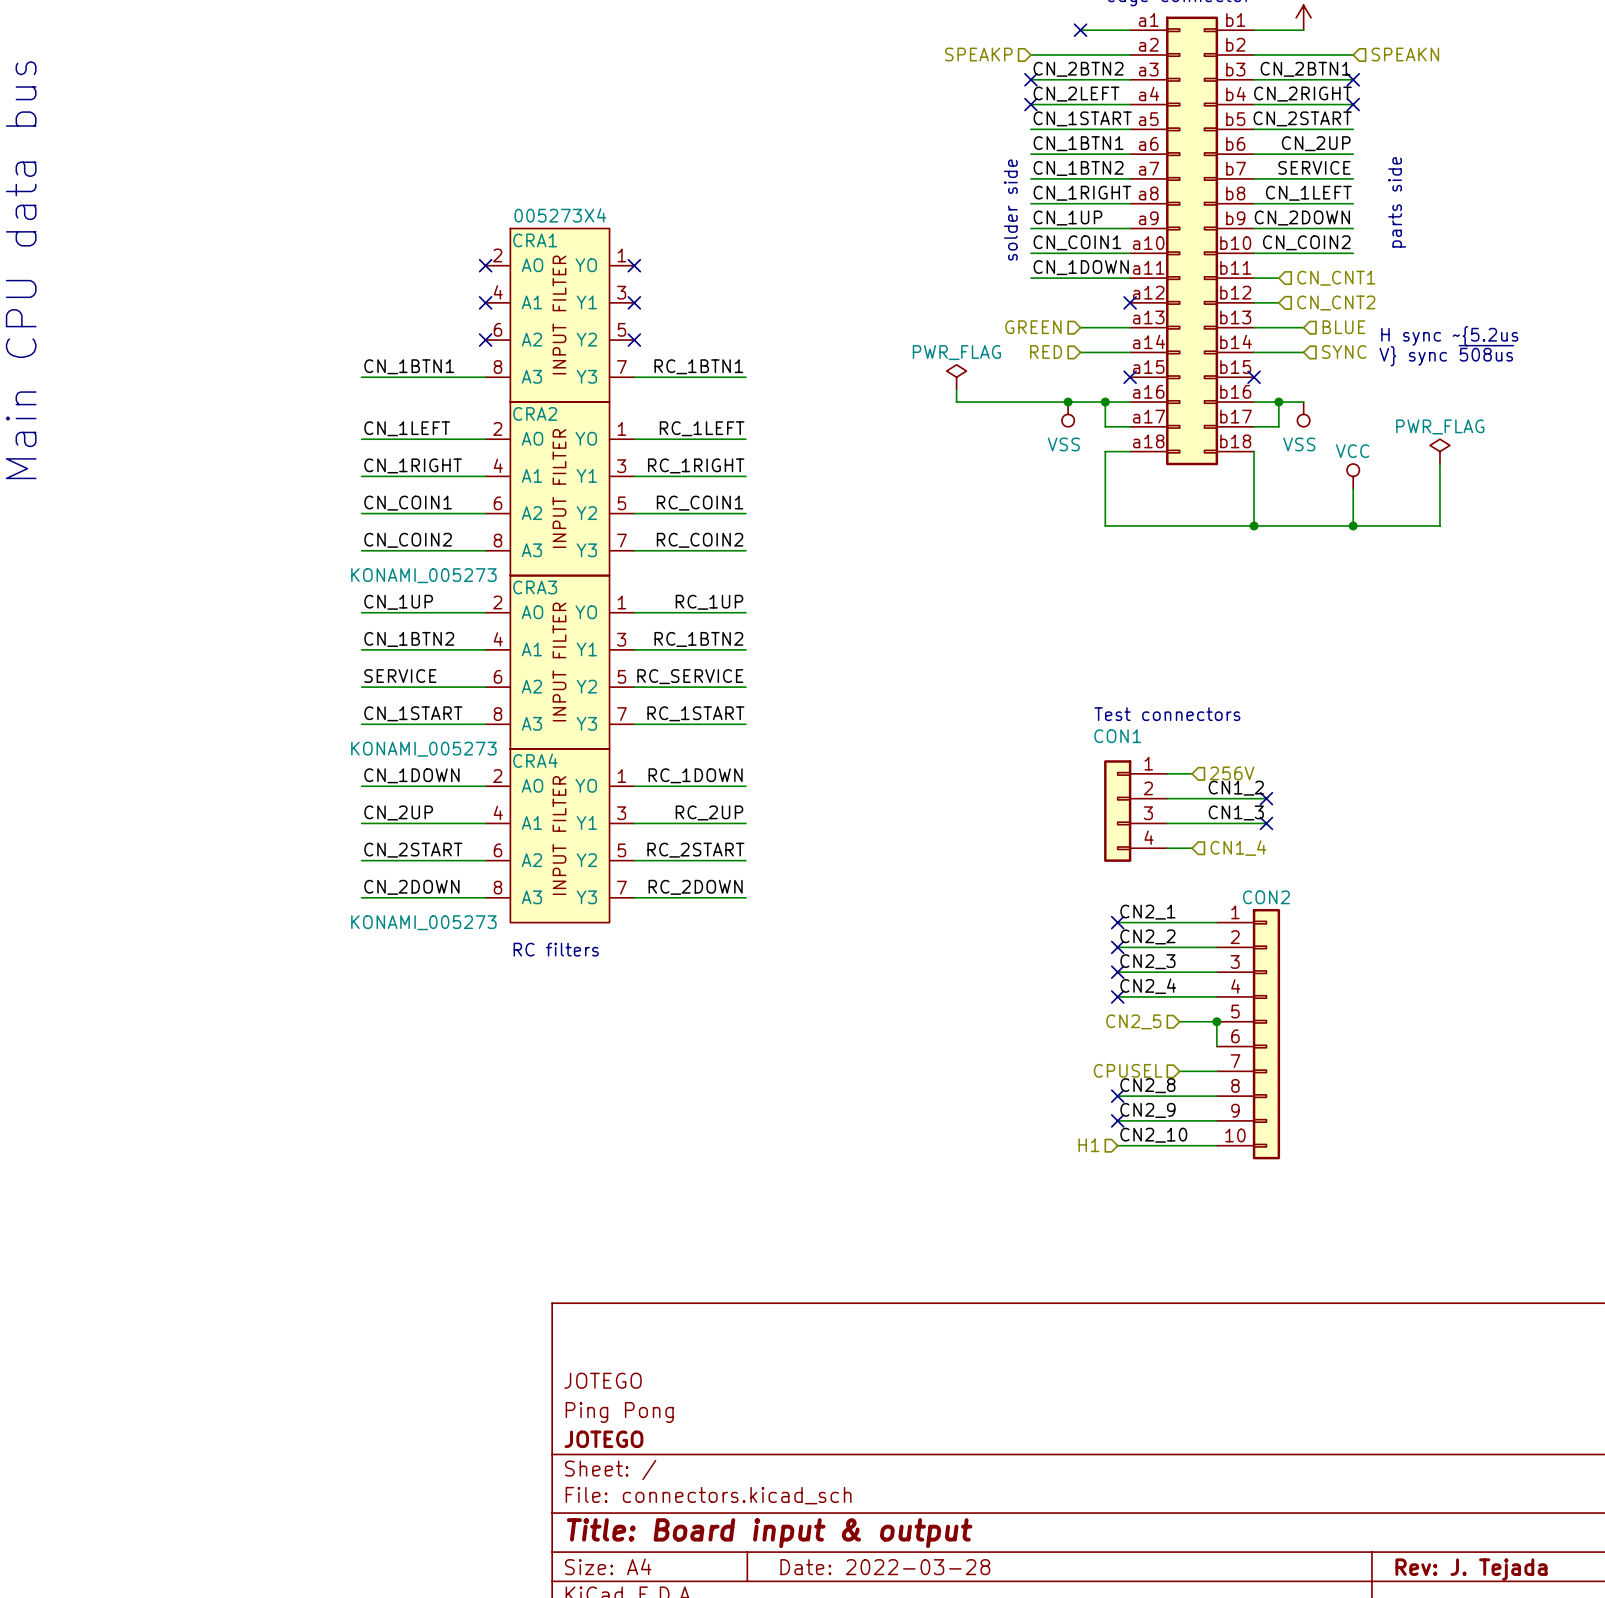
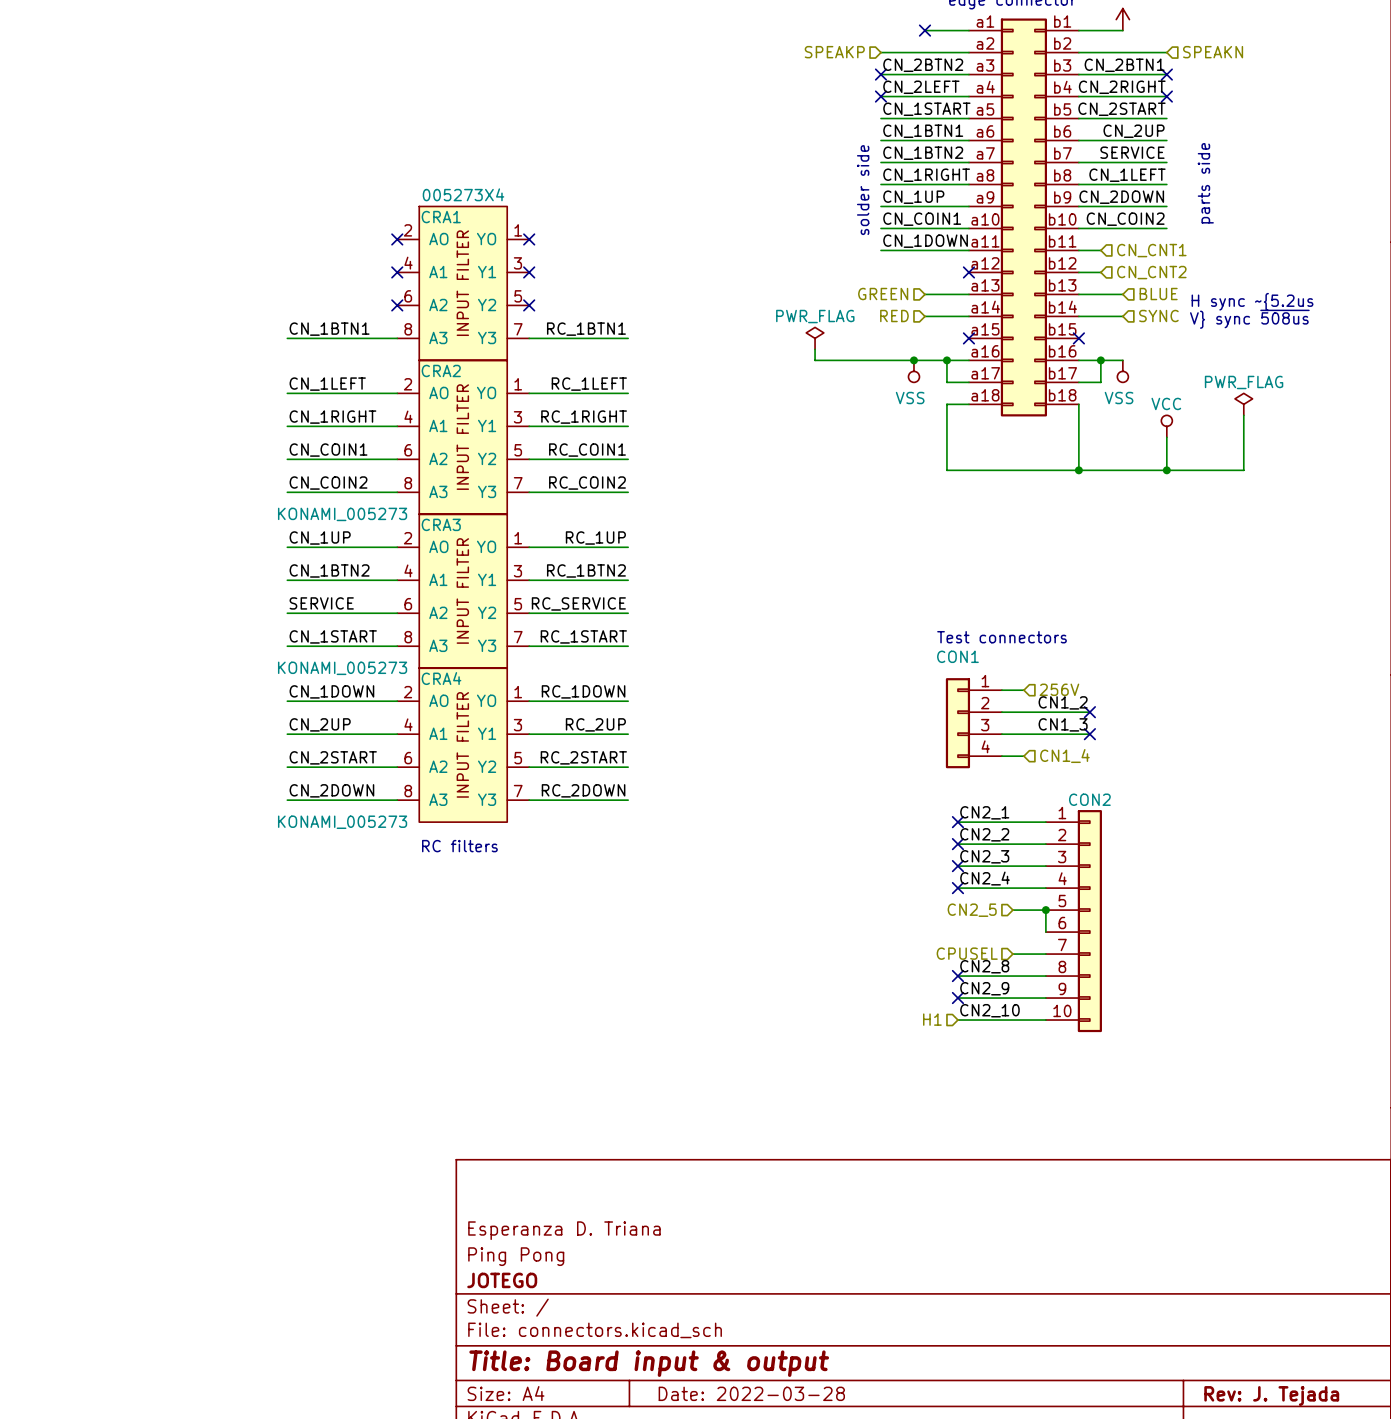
title block: JOTEGO (602, 1380) -> Esperanza D. Triana (564, 1230)

